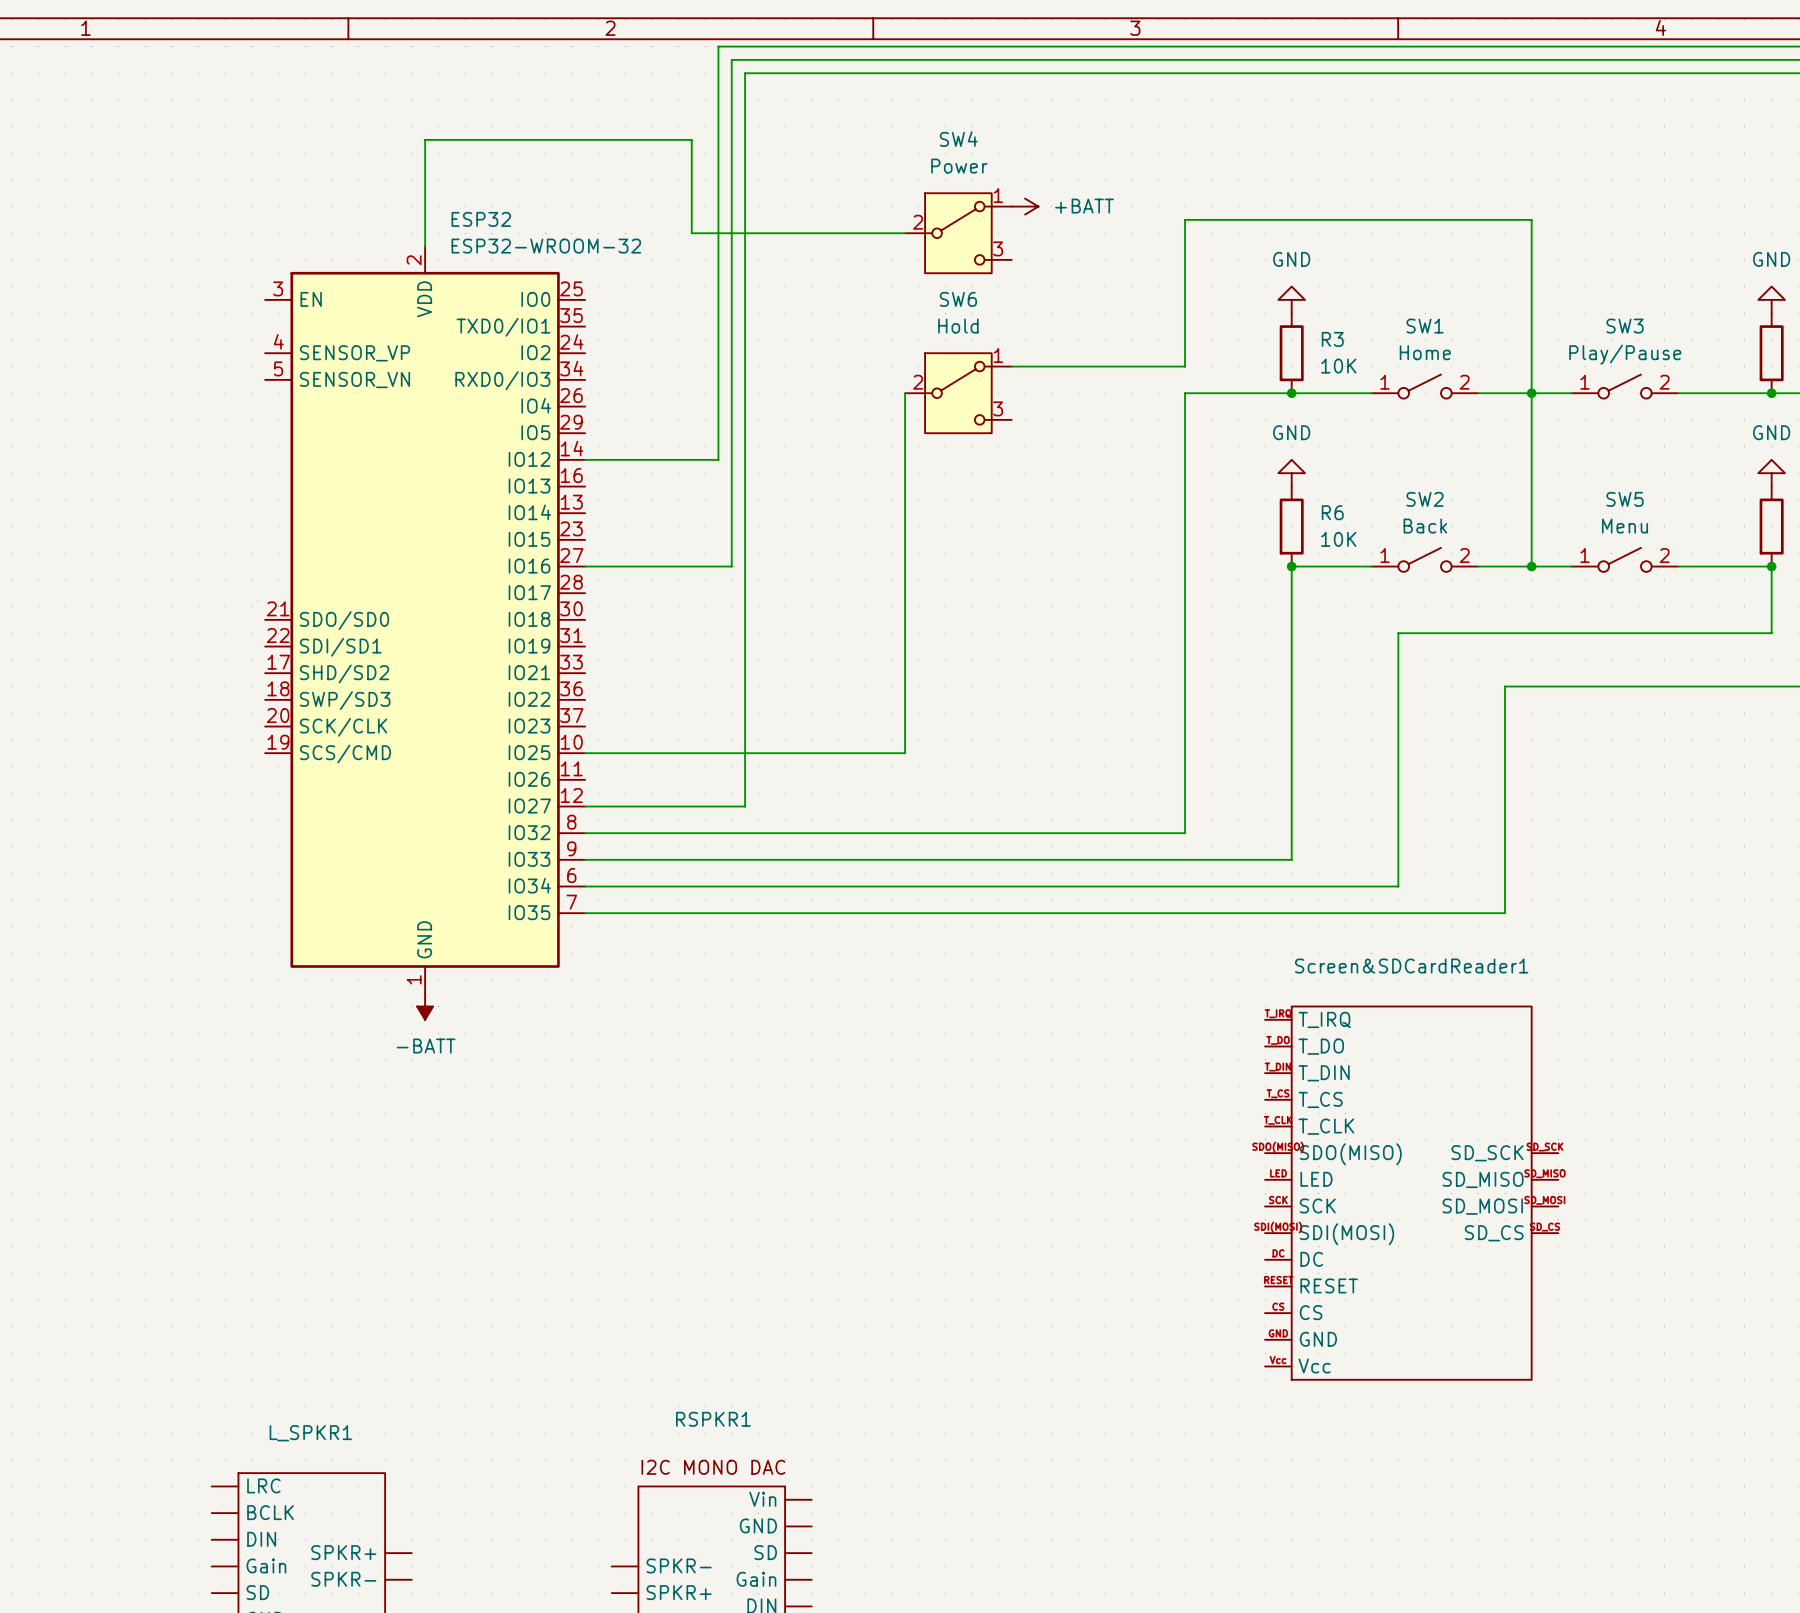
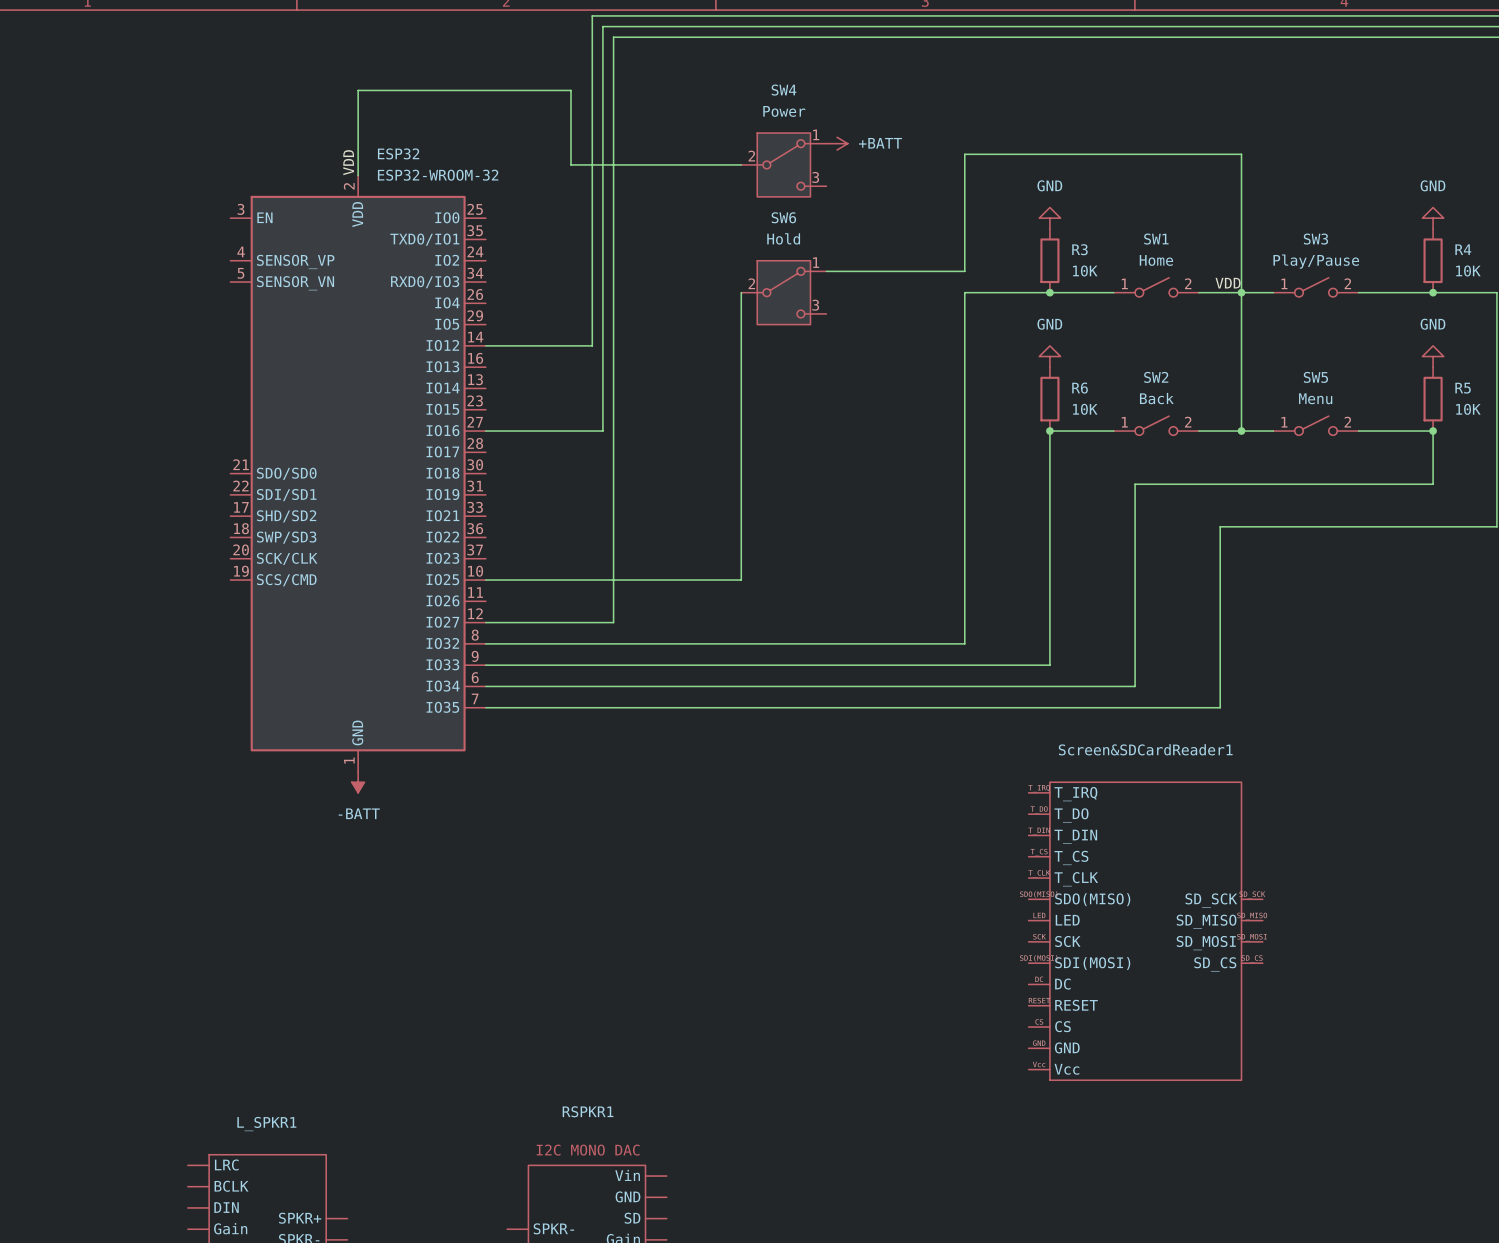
label: none -> VDD (348, 162)
label: none -> VDD (1228, 283)

